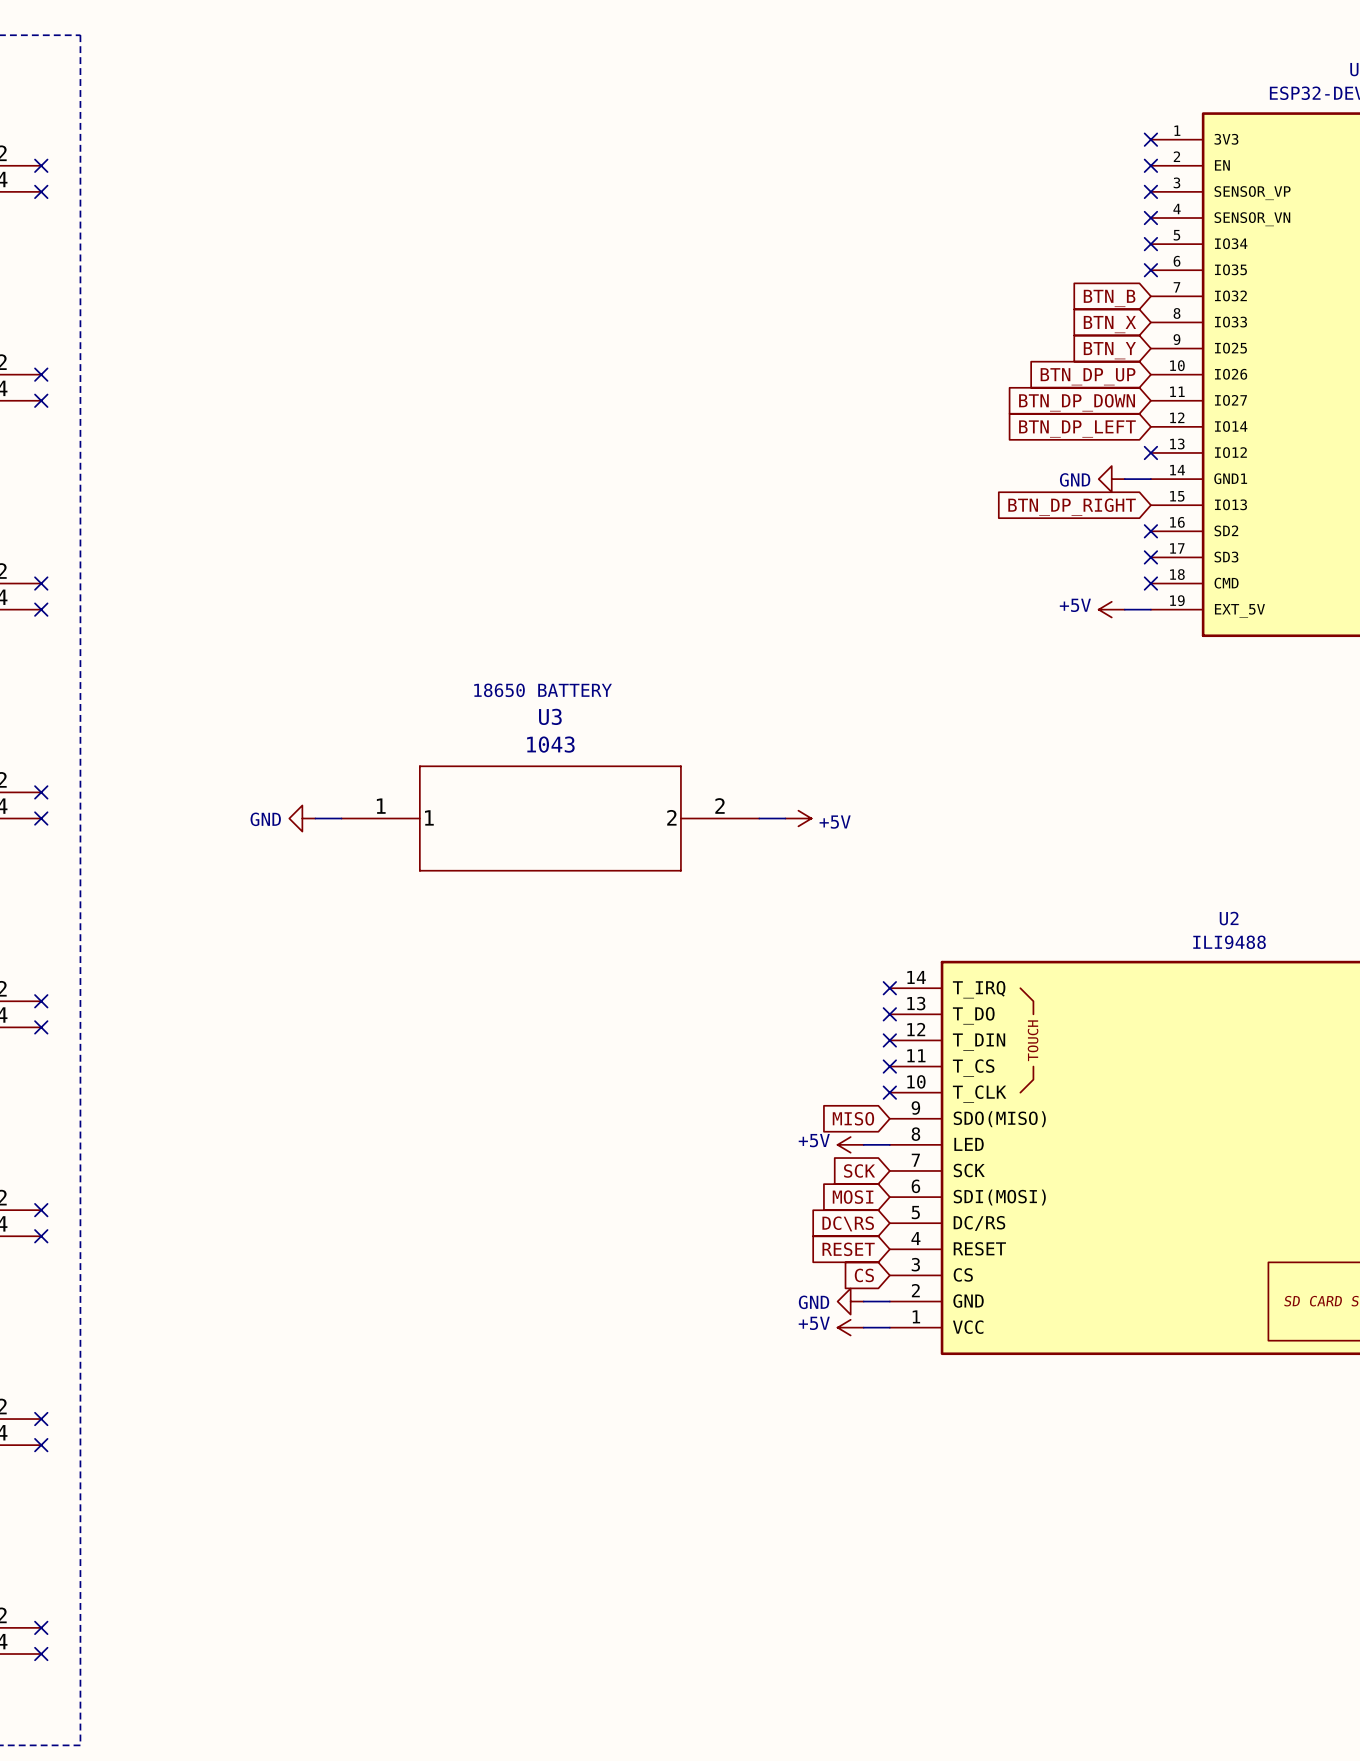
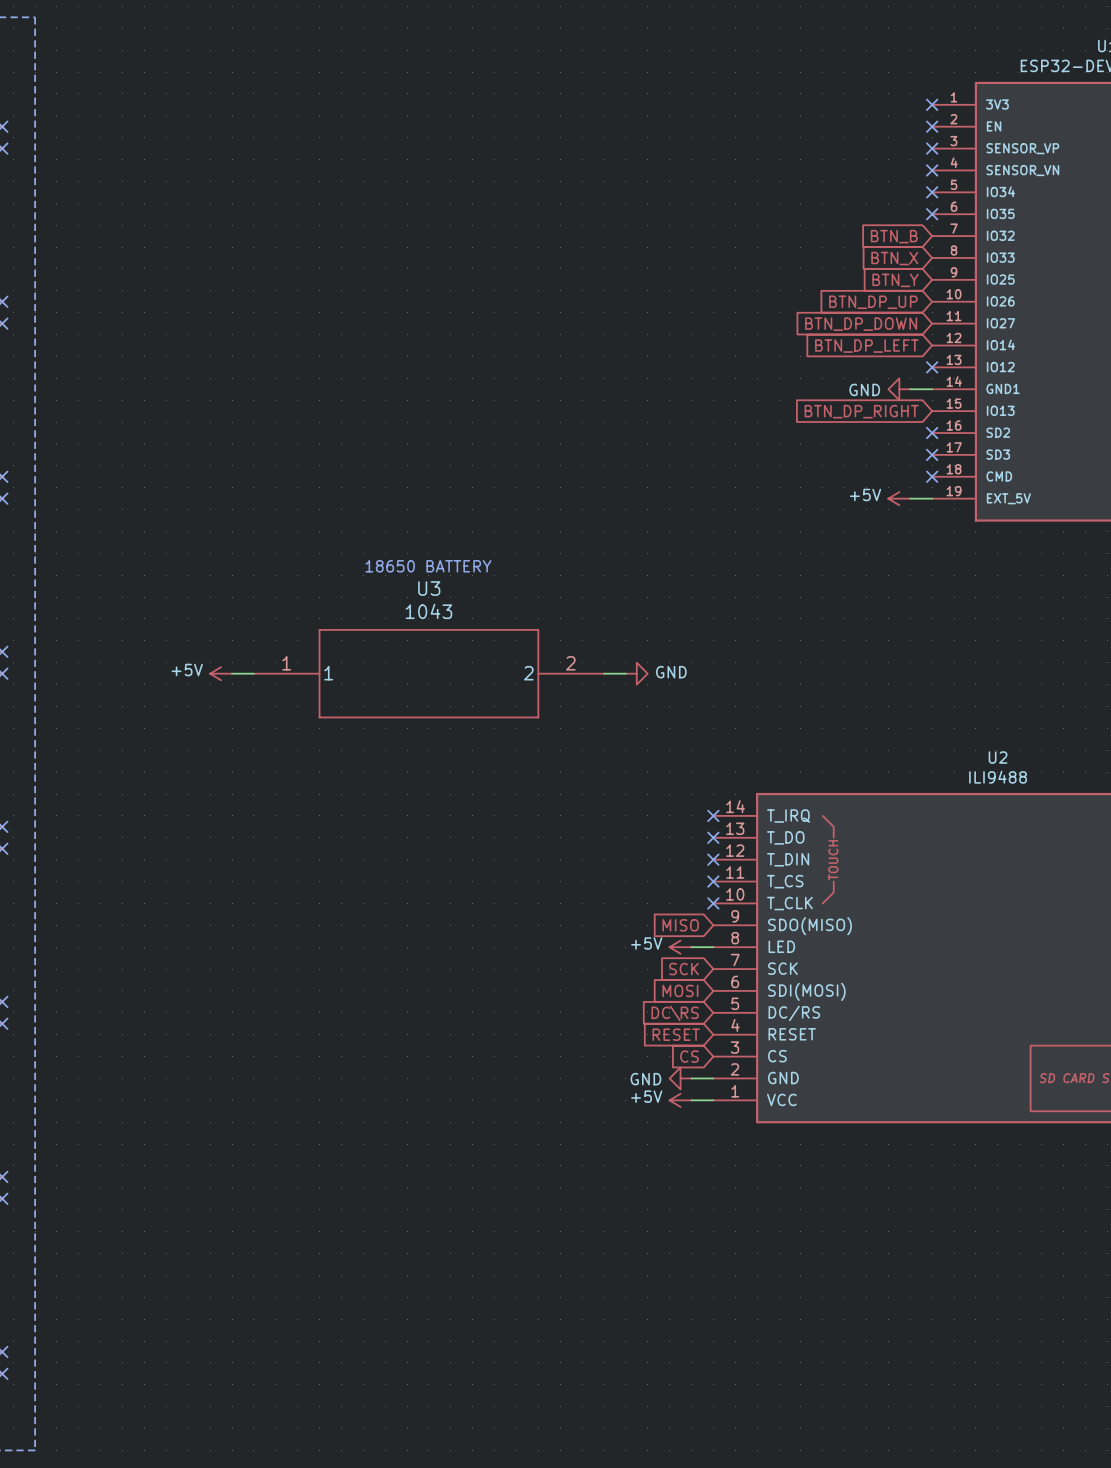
power symbol: GND (302, 818) -> +5V (221, 673)
power symbol: +5V (798, 818) -> GND (636, 673)

